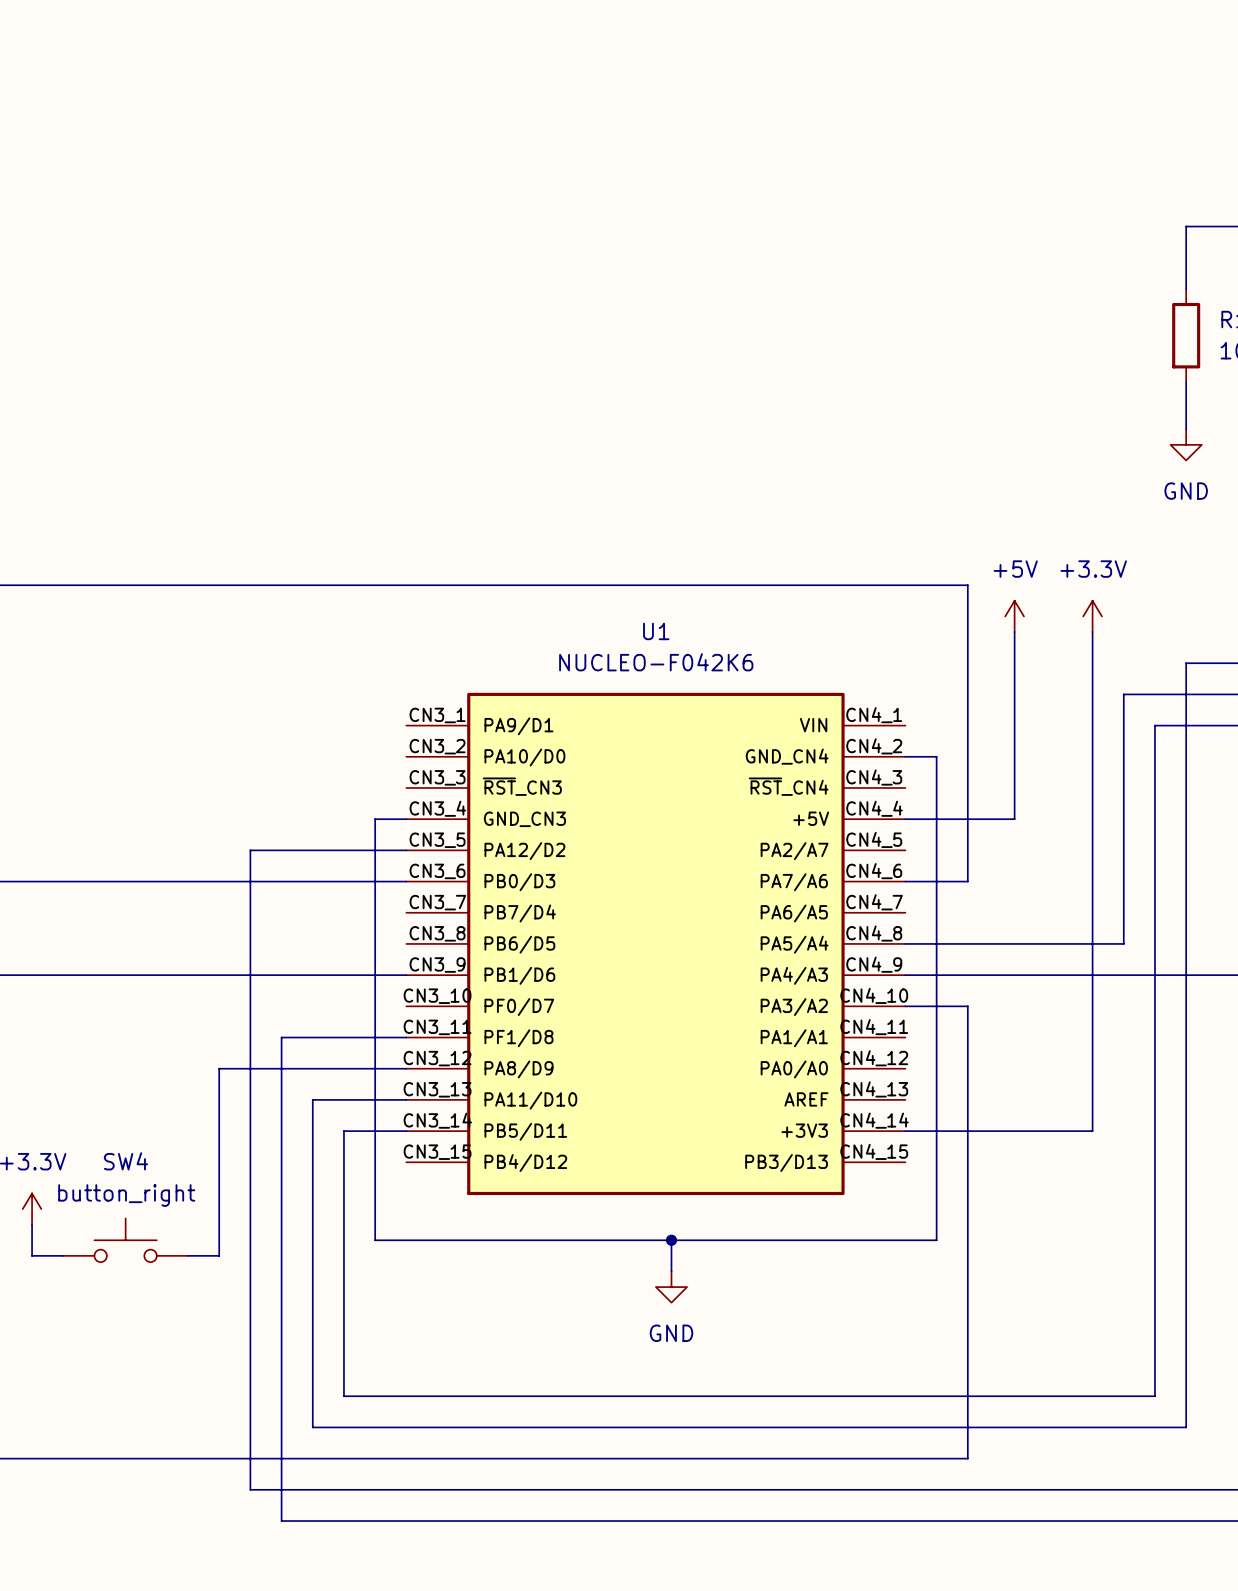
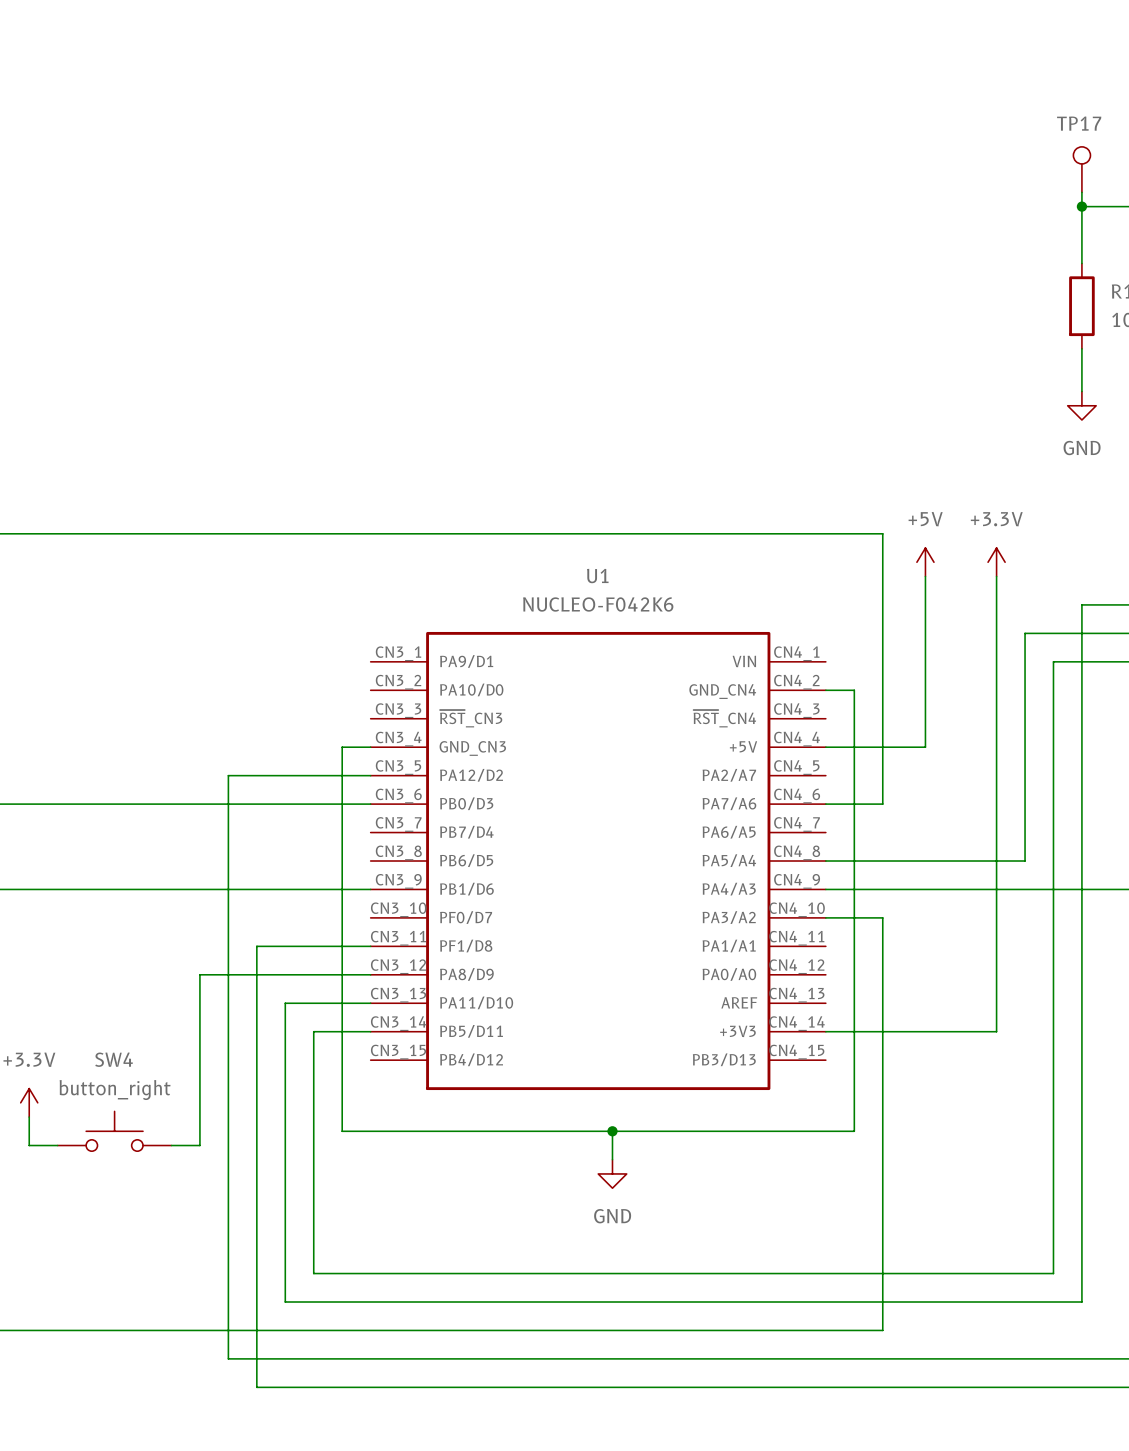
TP17: none -> (1081, 169)
wire: none -> (1081, 192) (1081, 206)
junction: none -> (1081, 206)

